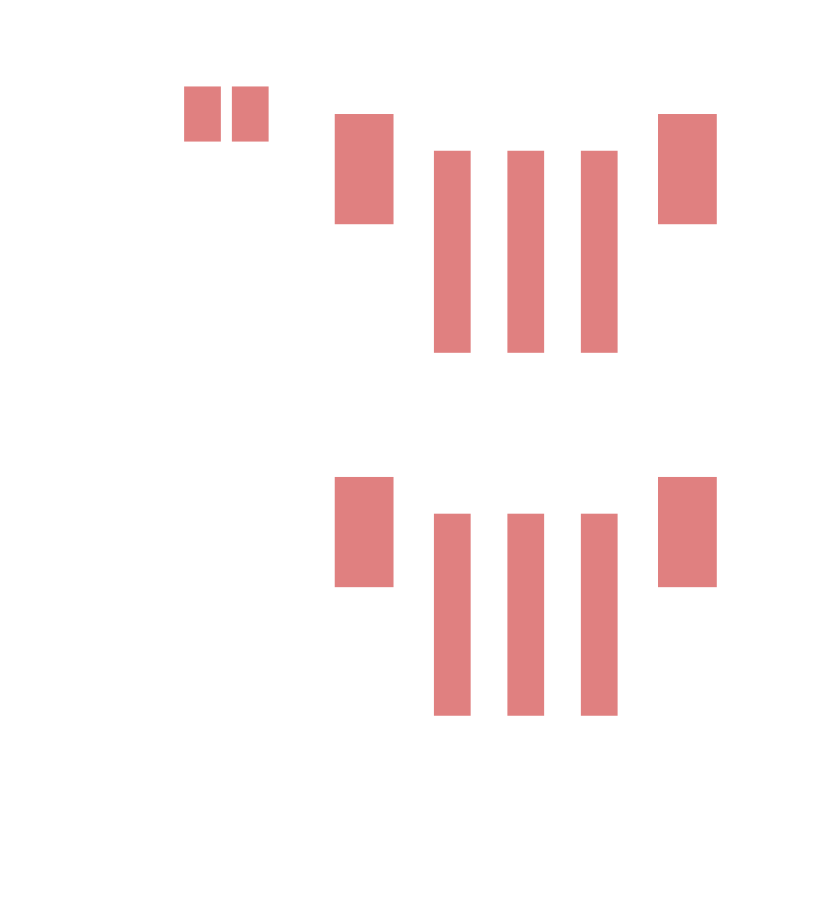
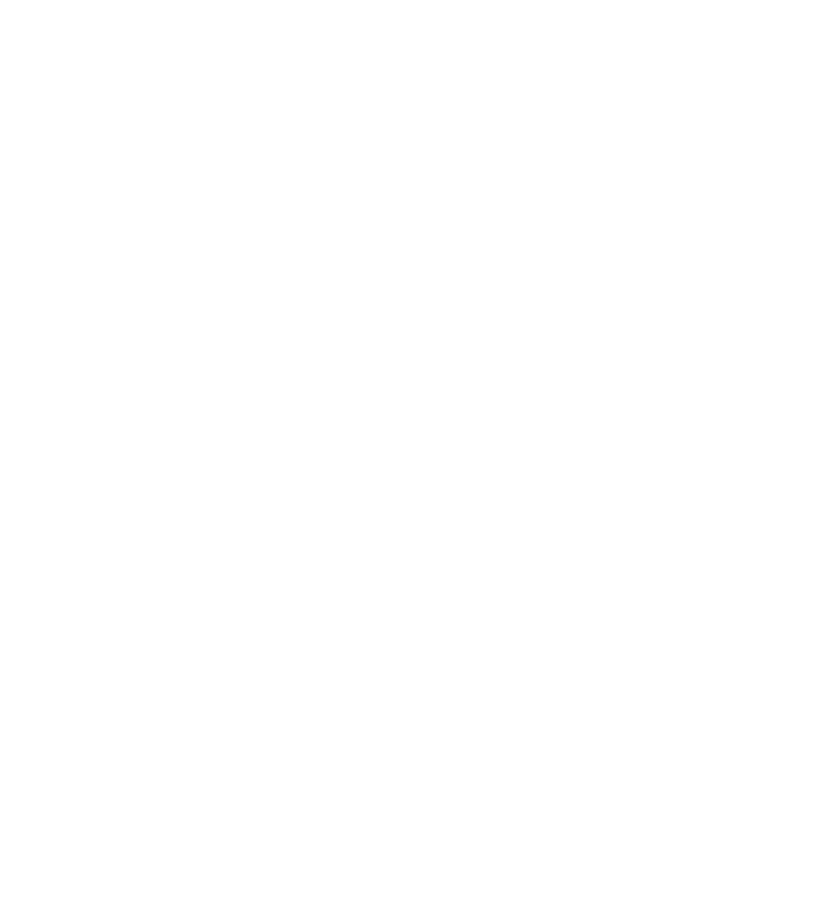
part: (226, 114) -> none
part: (525, 233) -> none
part: (525, 596) -> none

